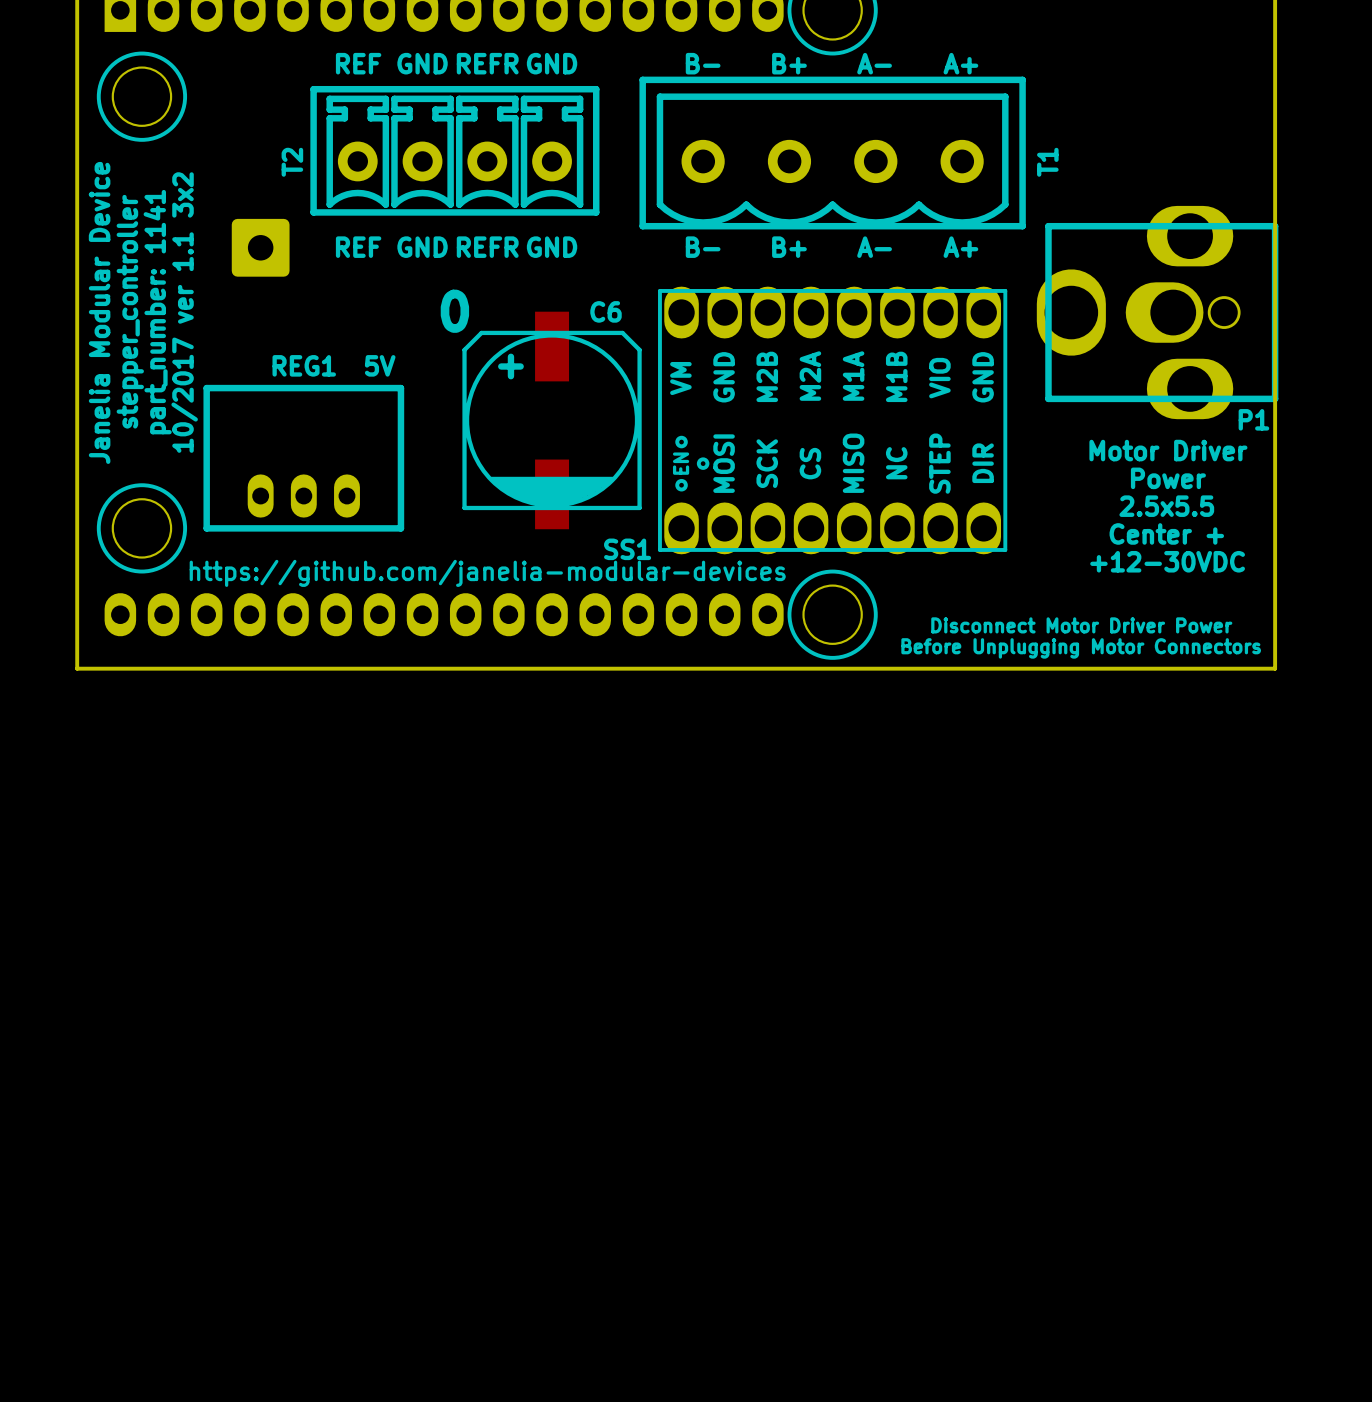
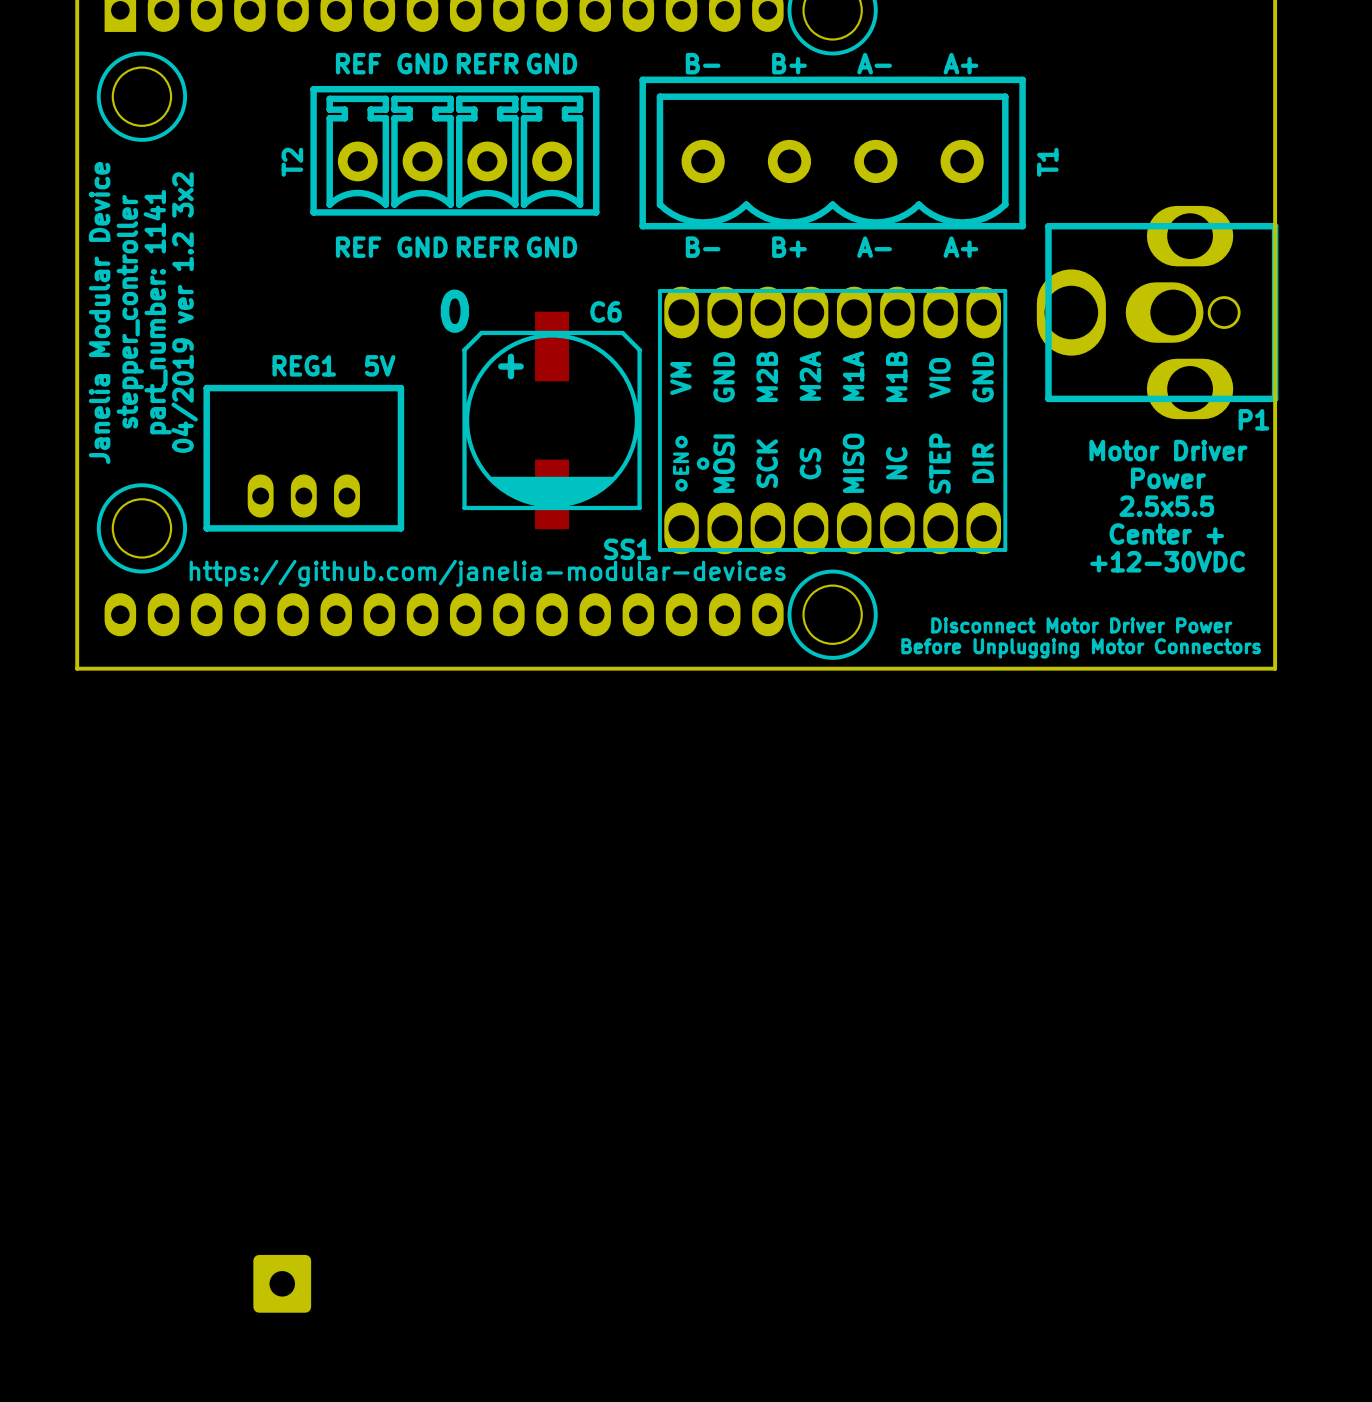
part: (260, 247) -> none
text: 10/2017 ver 1.1 3x2 (184, 312) -> 04/2019 ver 1.2 3x2 (184, 312)
part: none -> (282, 1283)

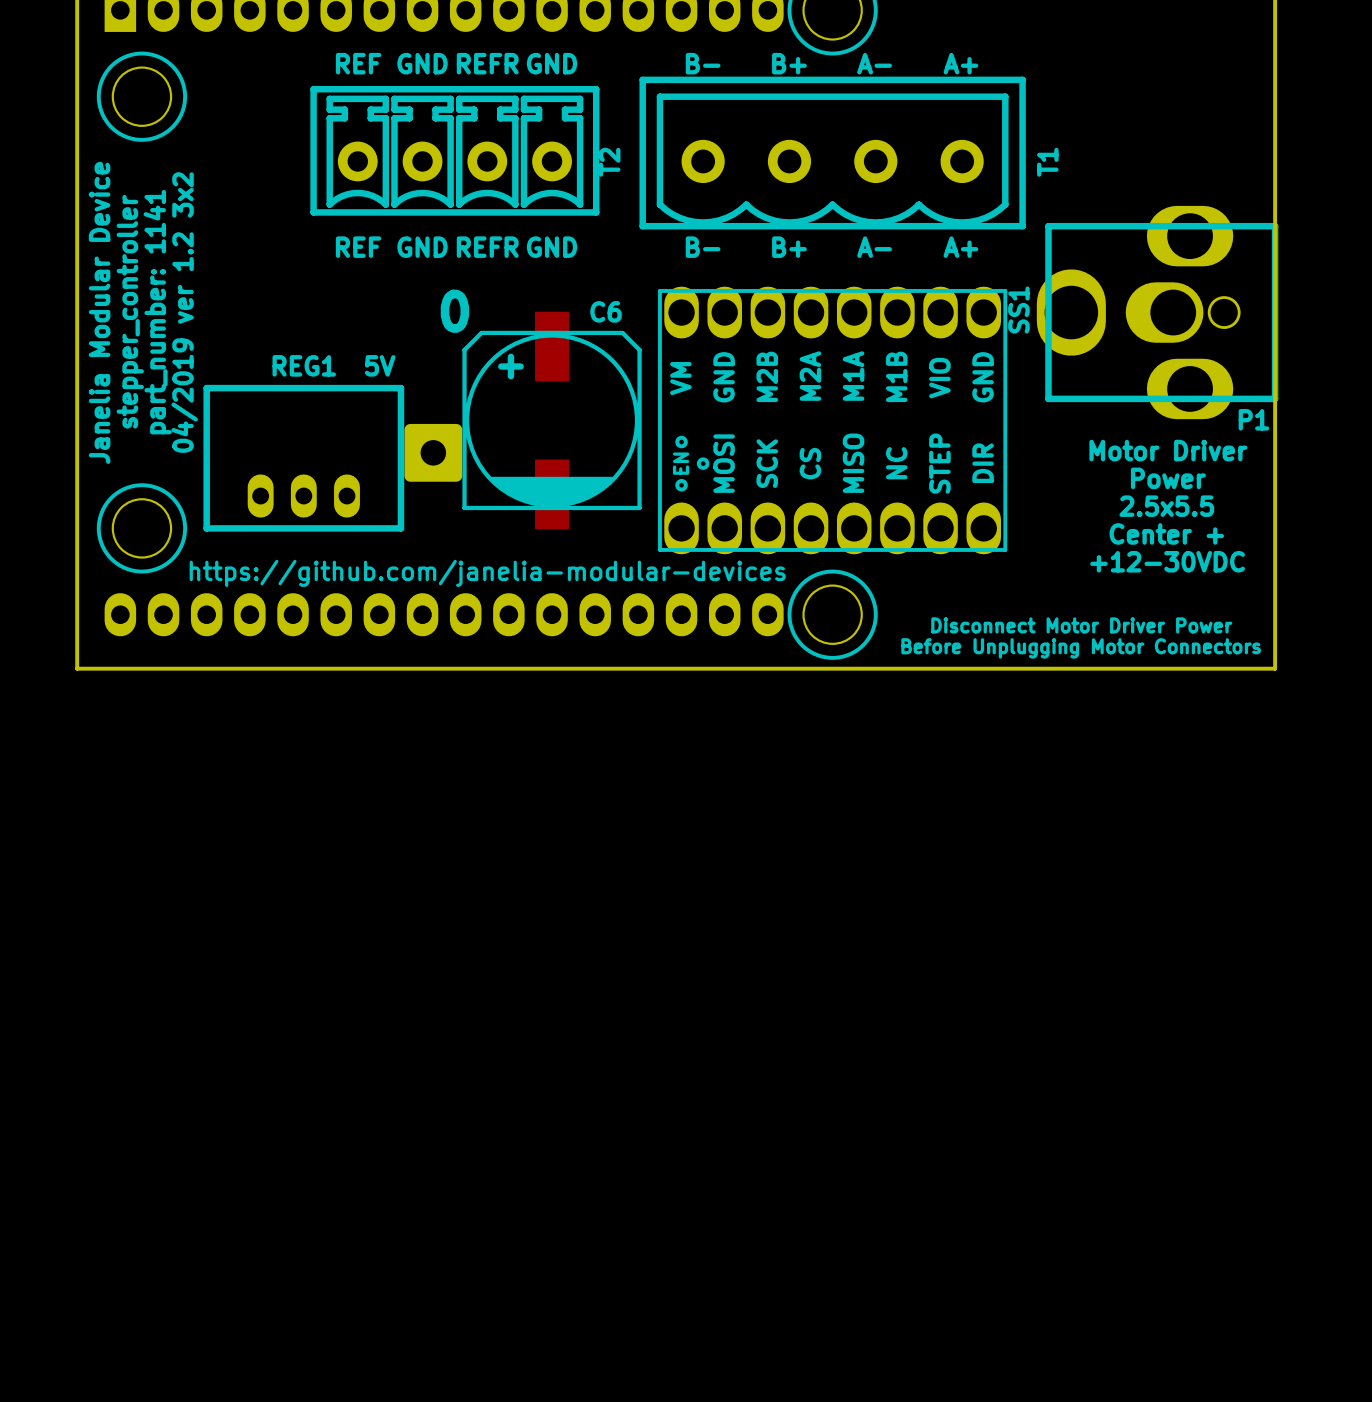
T2 name position: T2 (292, 162) -> T2 (609, 162)
part: none -> (433, 452)
SS1 name rotation: 0° (627, 549) -> 90° counterclockwise (1018, 309)
SS1 name position: SS1 (627, 549) -> SS1 (1018, 309)
part: (282, 1283) -> none

